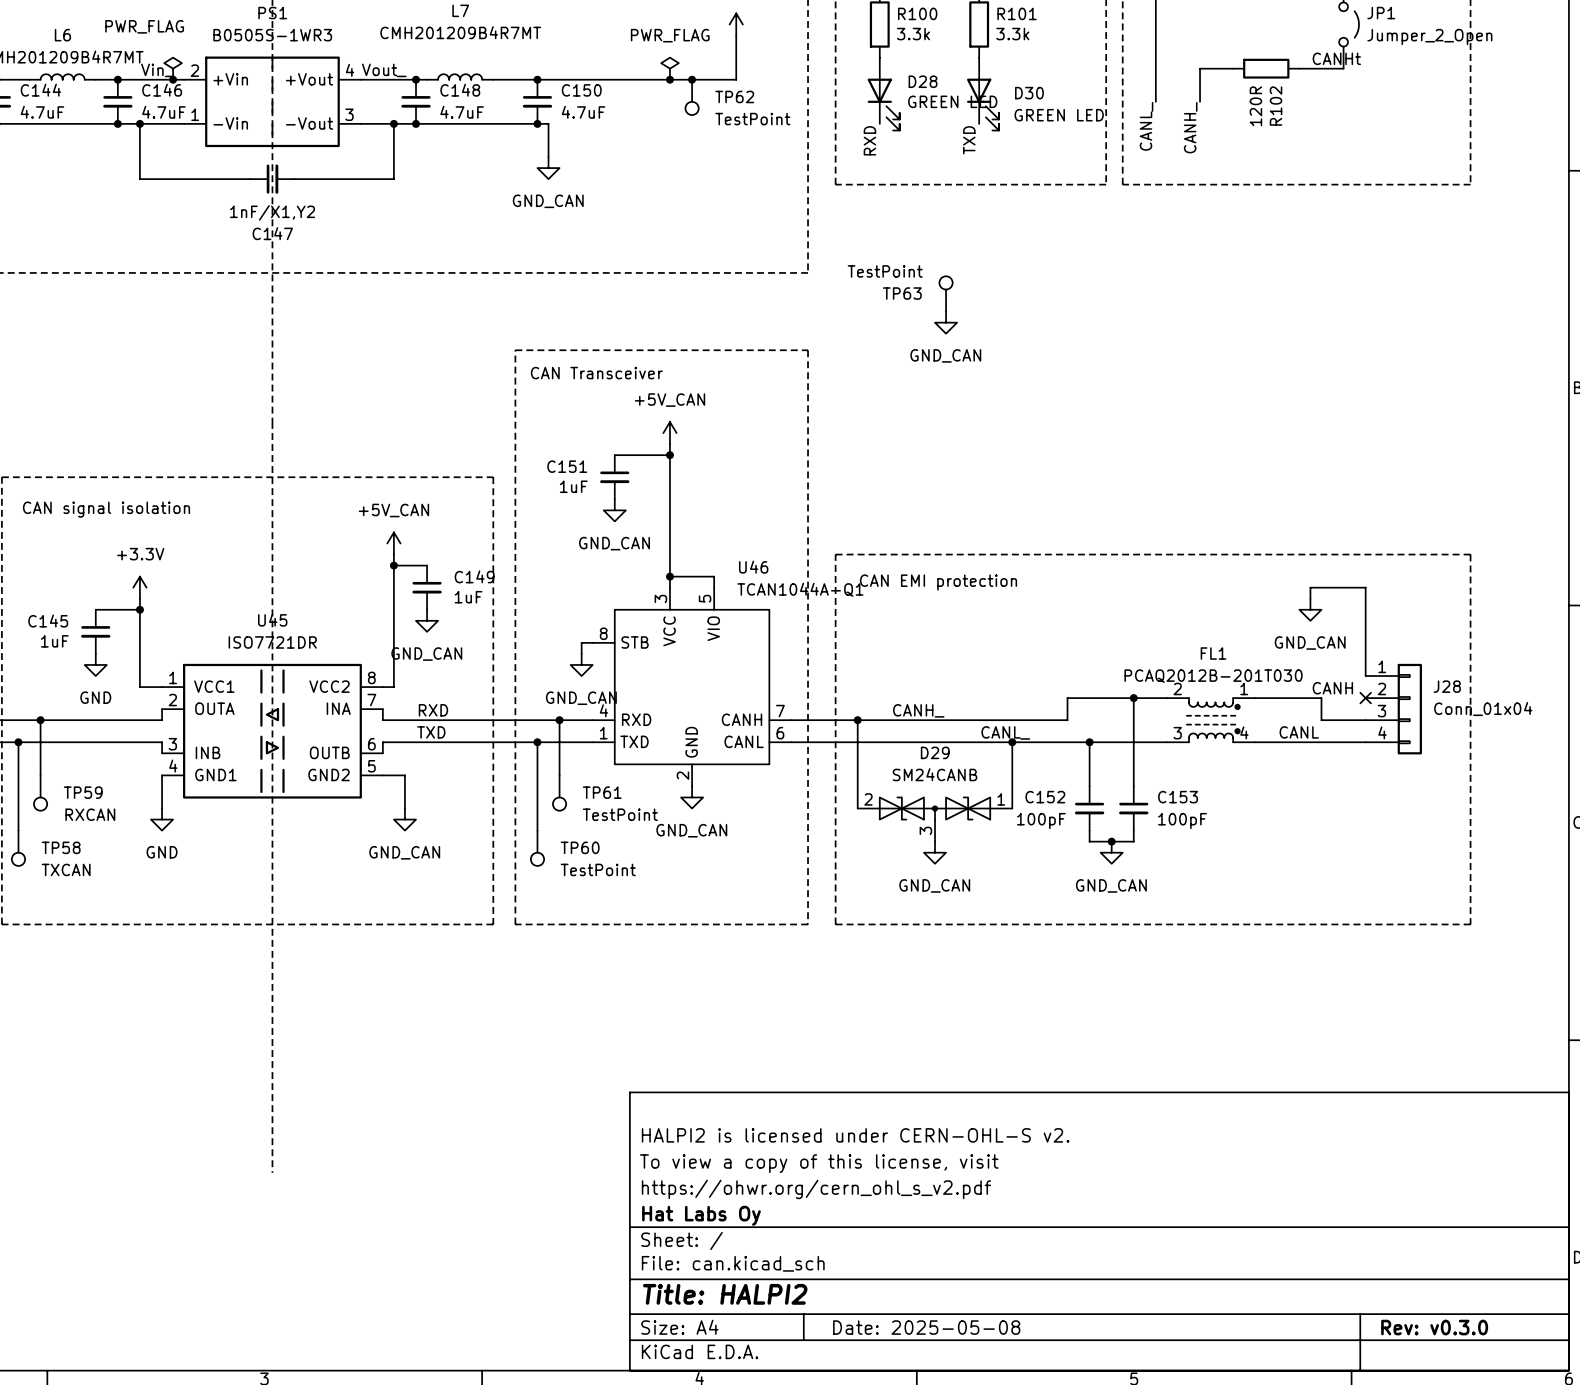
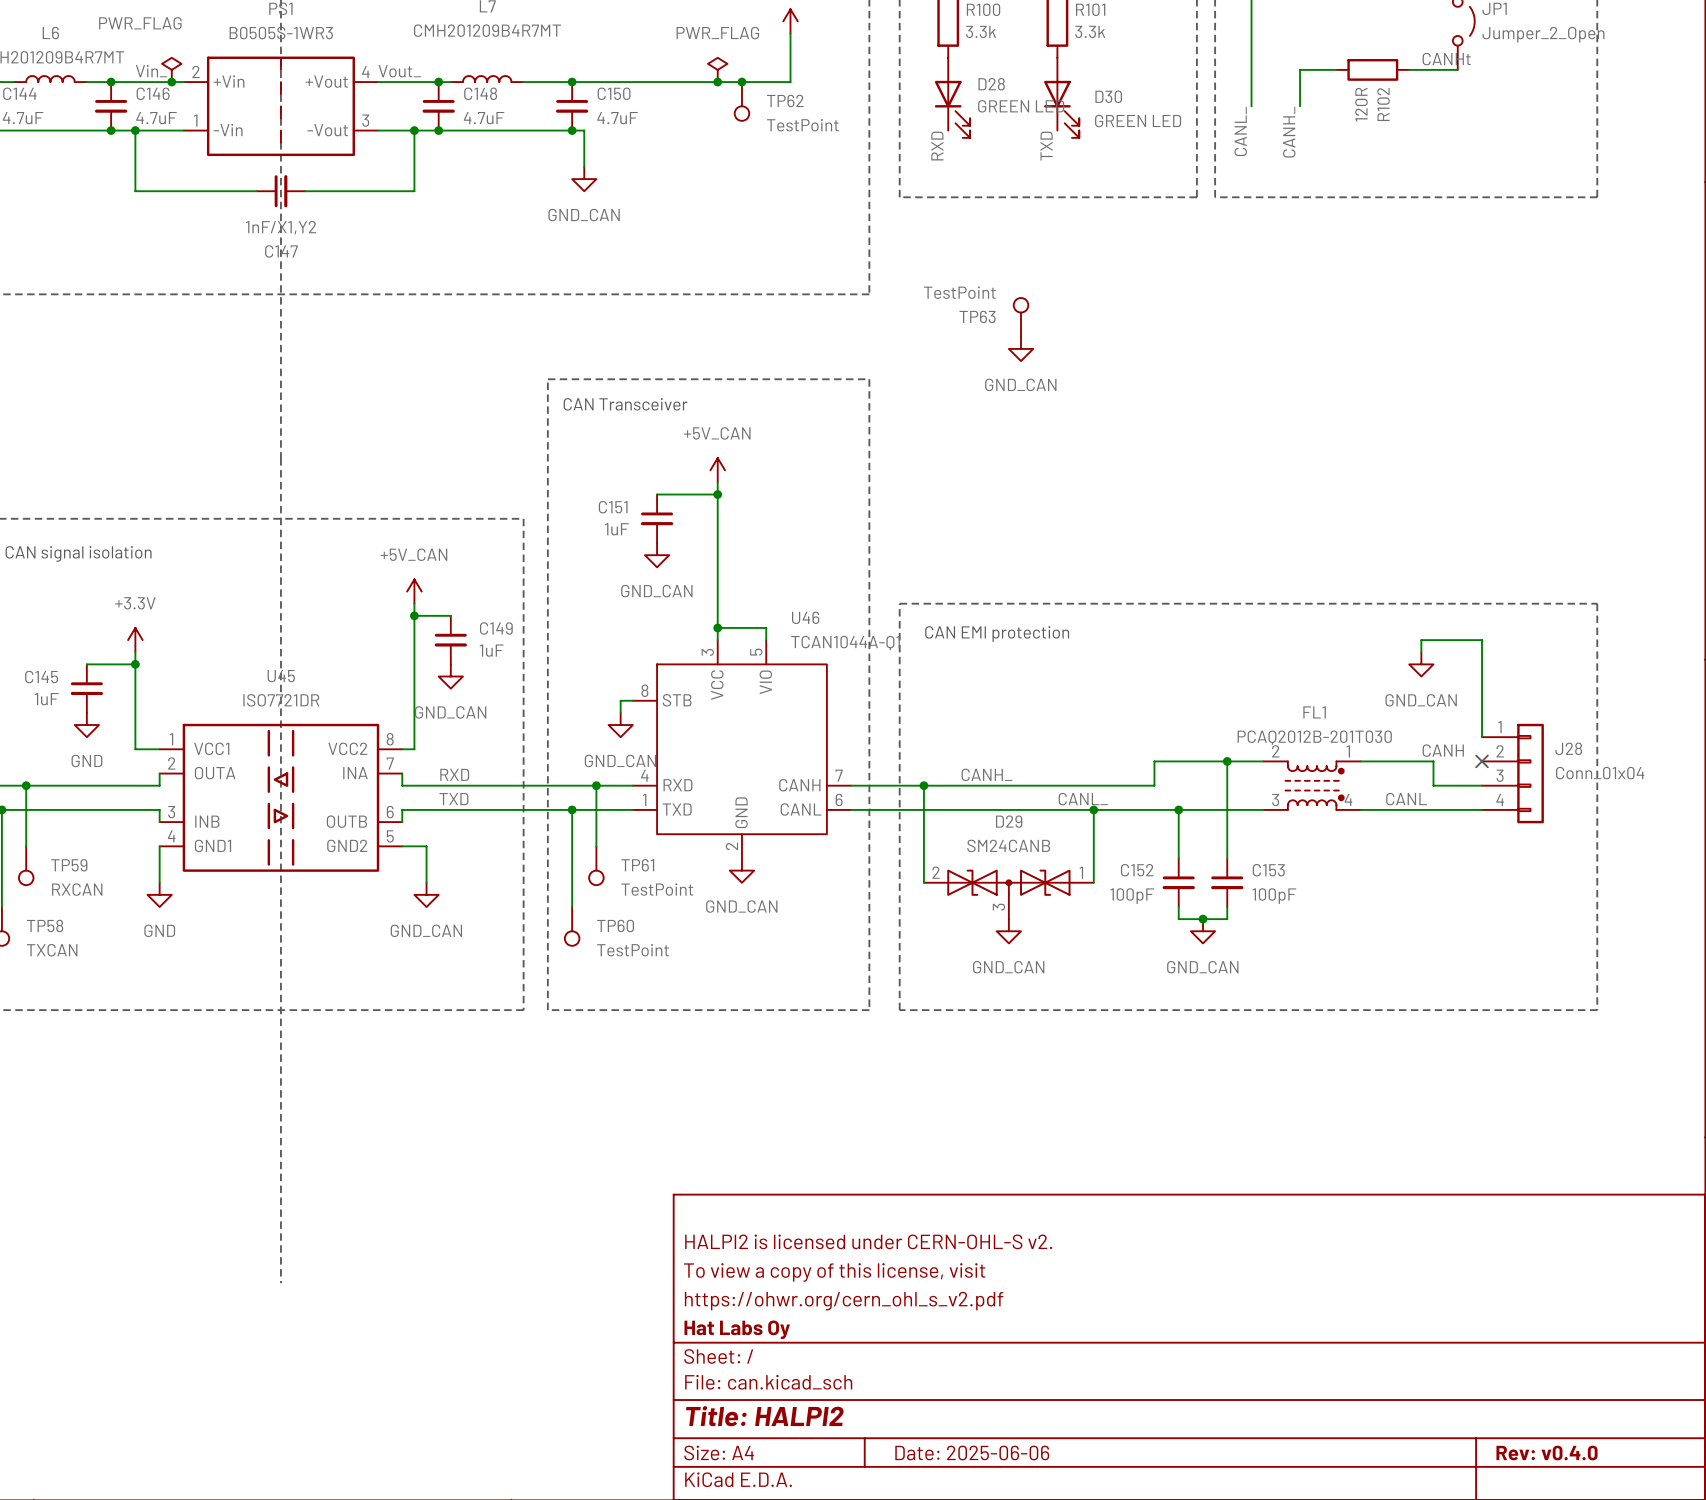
title block: Date: 2025-05-08 (926, 1327) -> Date: 2025-06-06 (972, 1452)
title block: Rev: v0.3.0 (1434, 1327) -> Rev: v0.4.0 (1547, 1453)

